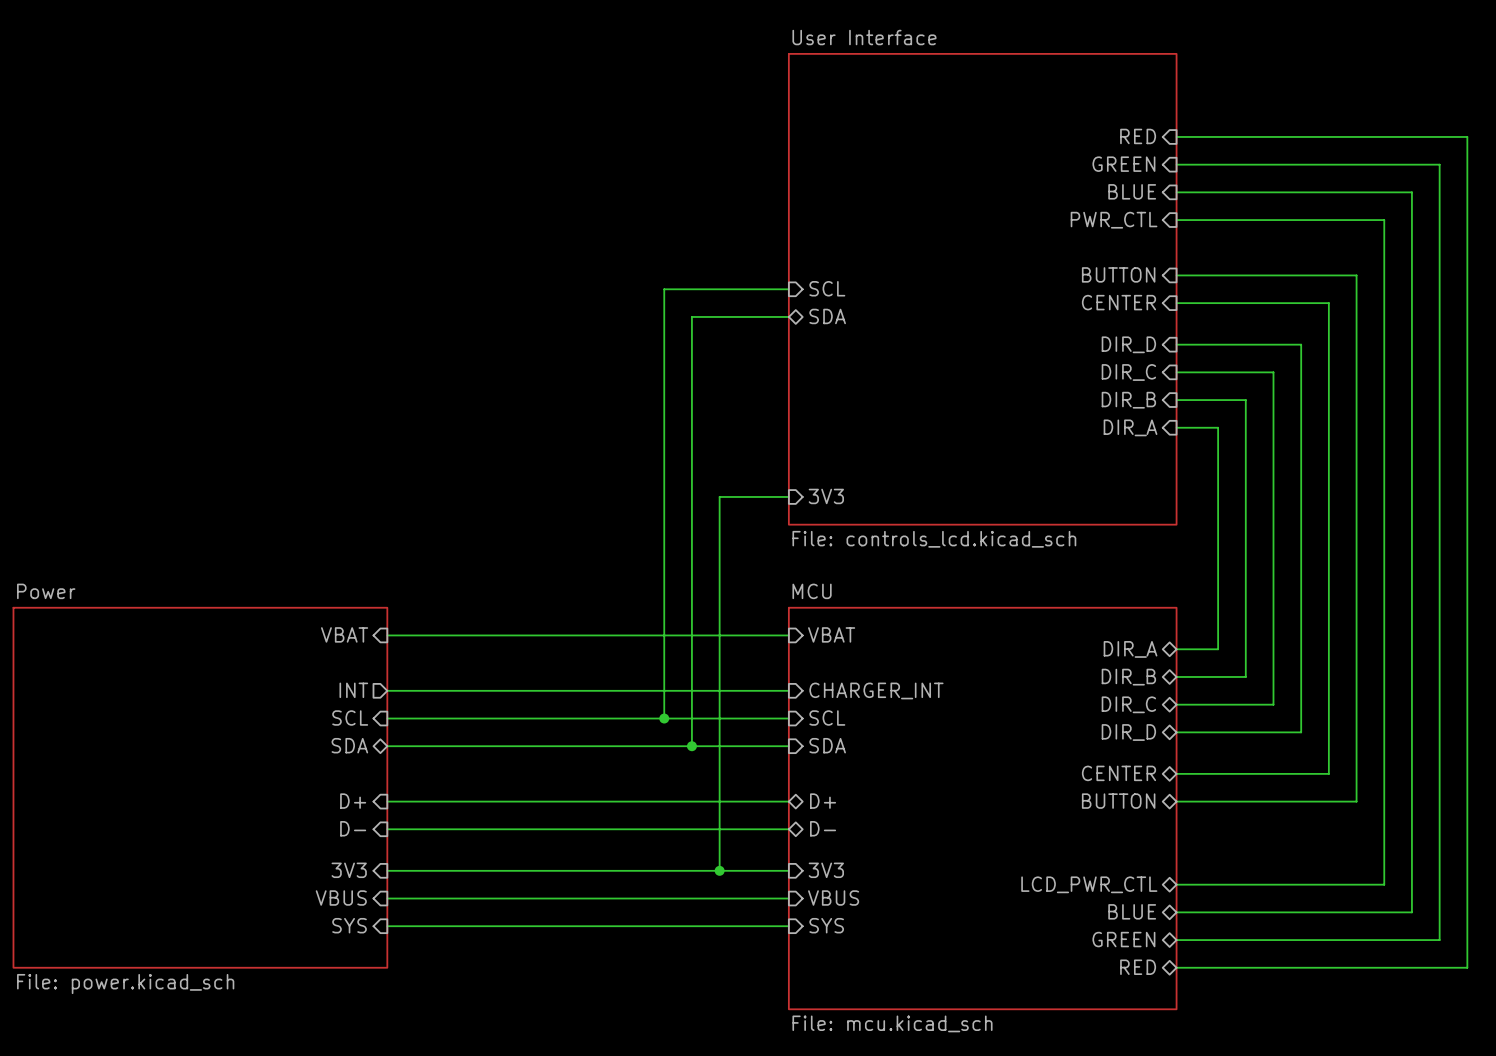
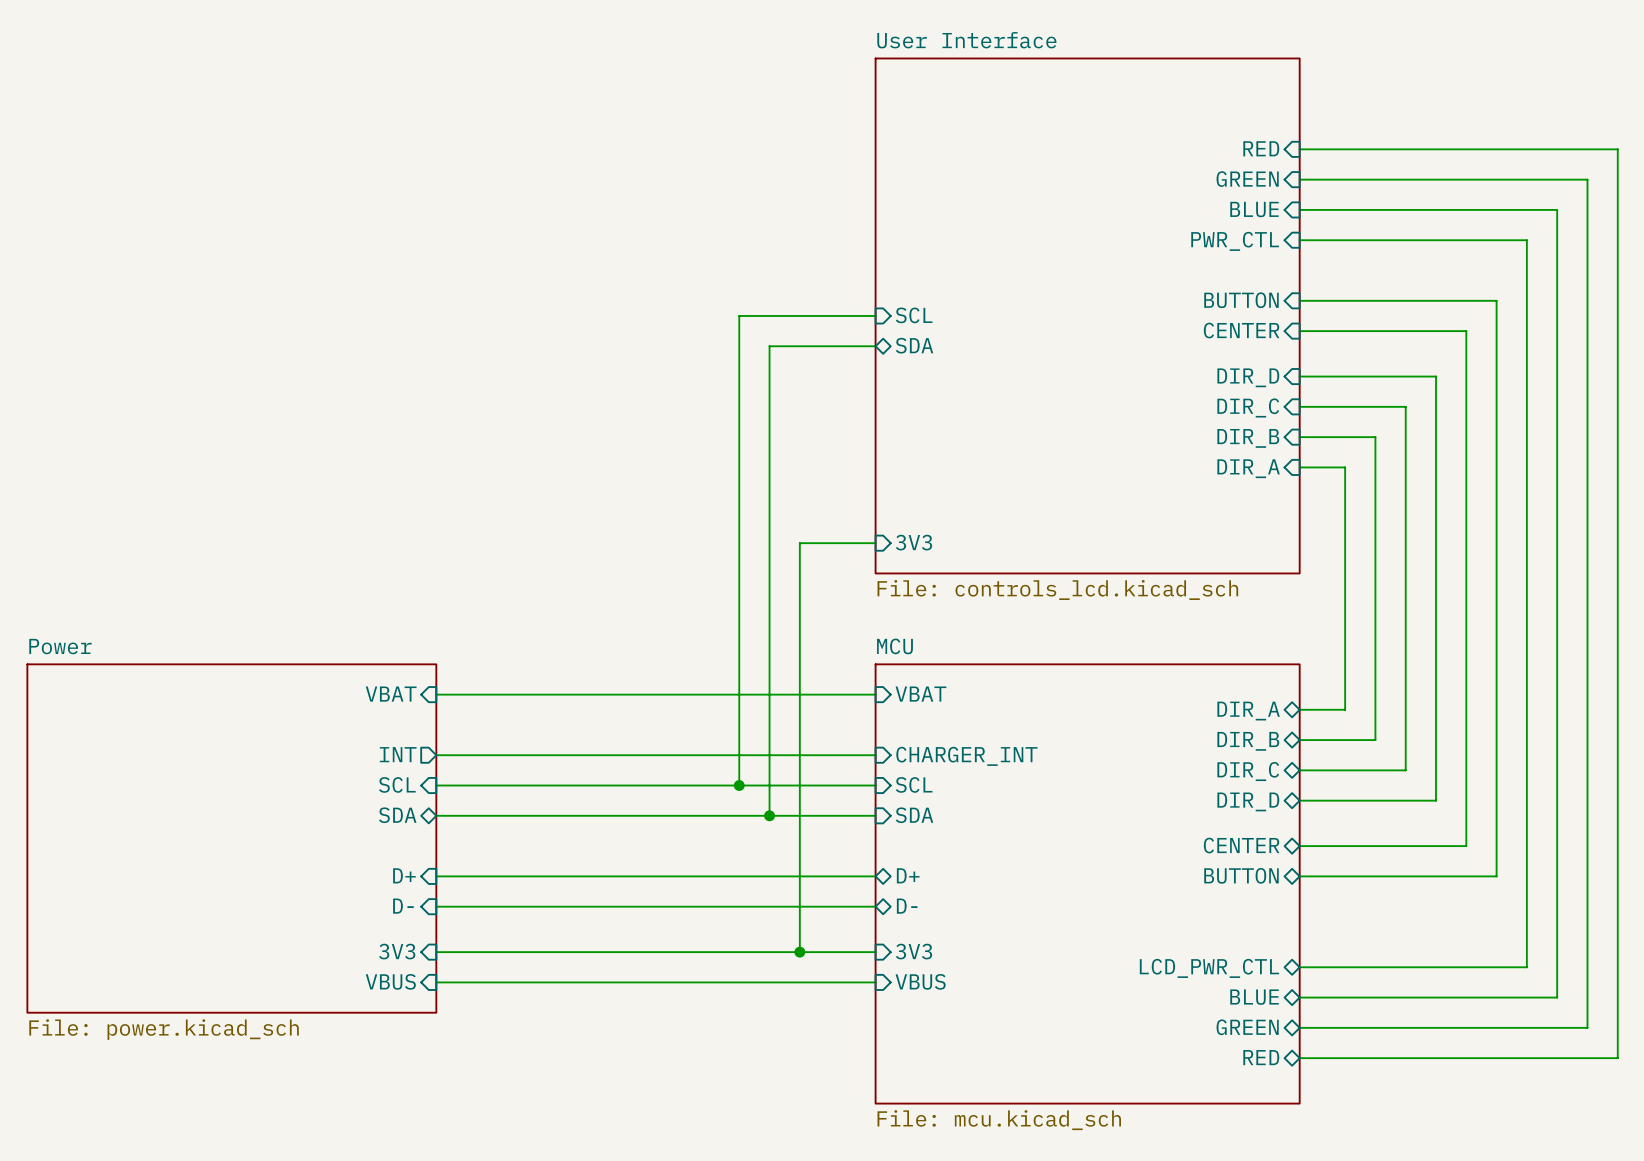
sheet Power: none -> File: power.kicad_sch (231, 838)
sheet Power: File: power.kicad_sch (200, 787) -> none
sheet pin: SYS (349, 925) -> none
sheet pin: SYS (826, 925) -> none
wire: (387, 926) (788, 926) -> none

